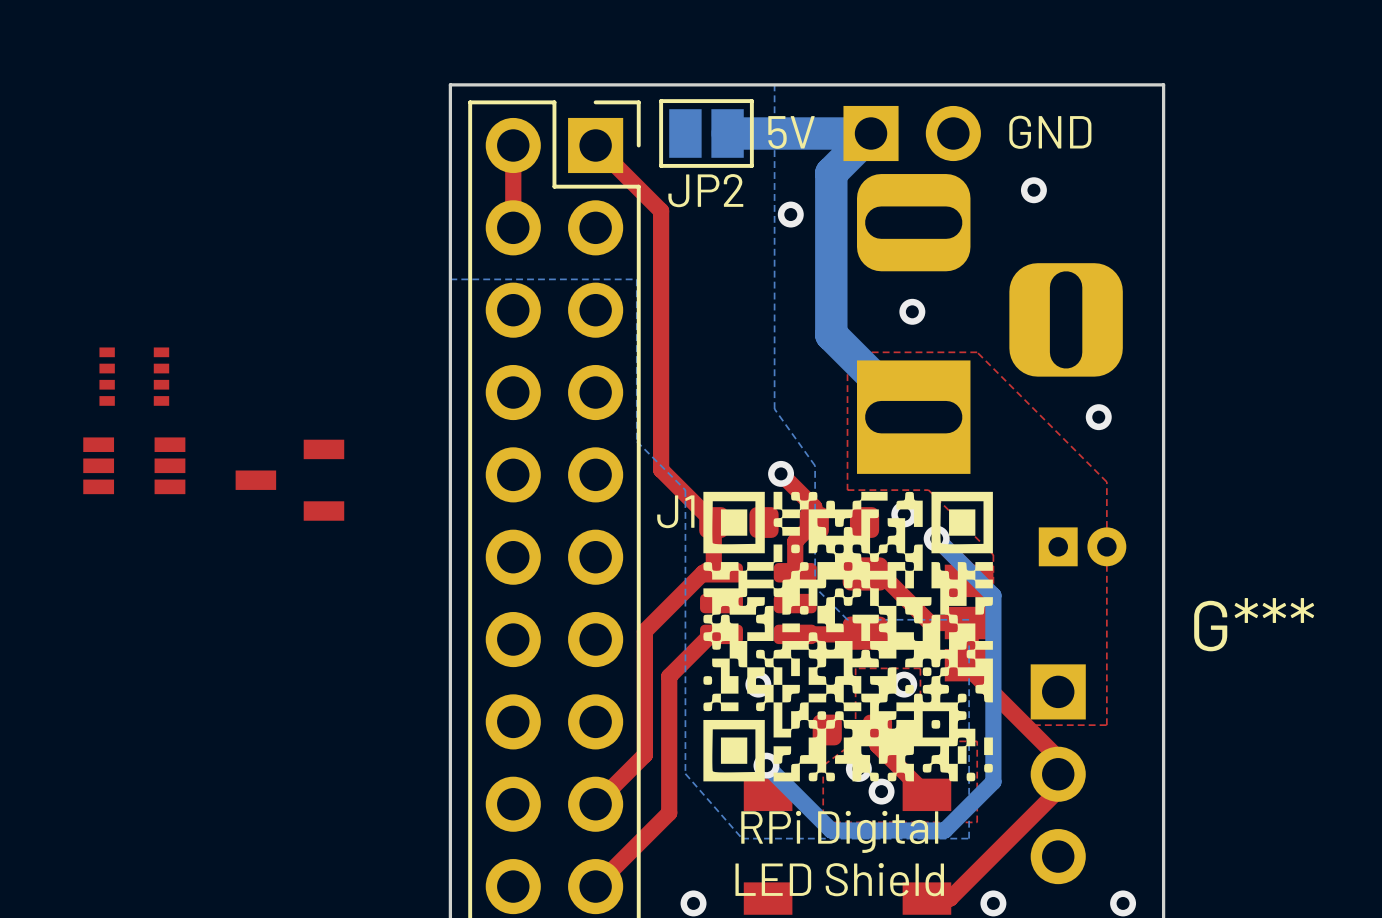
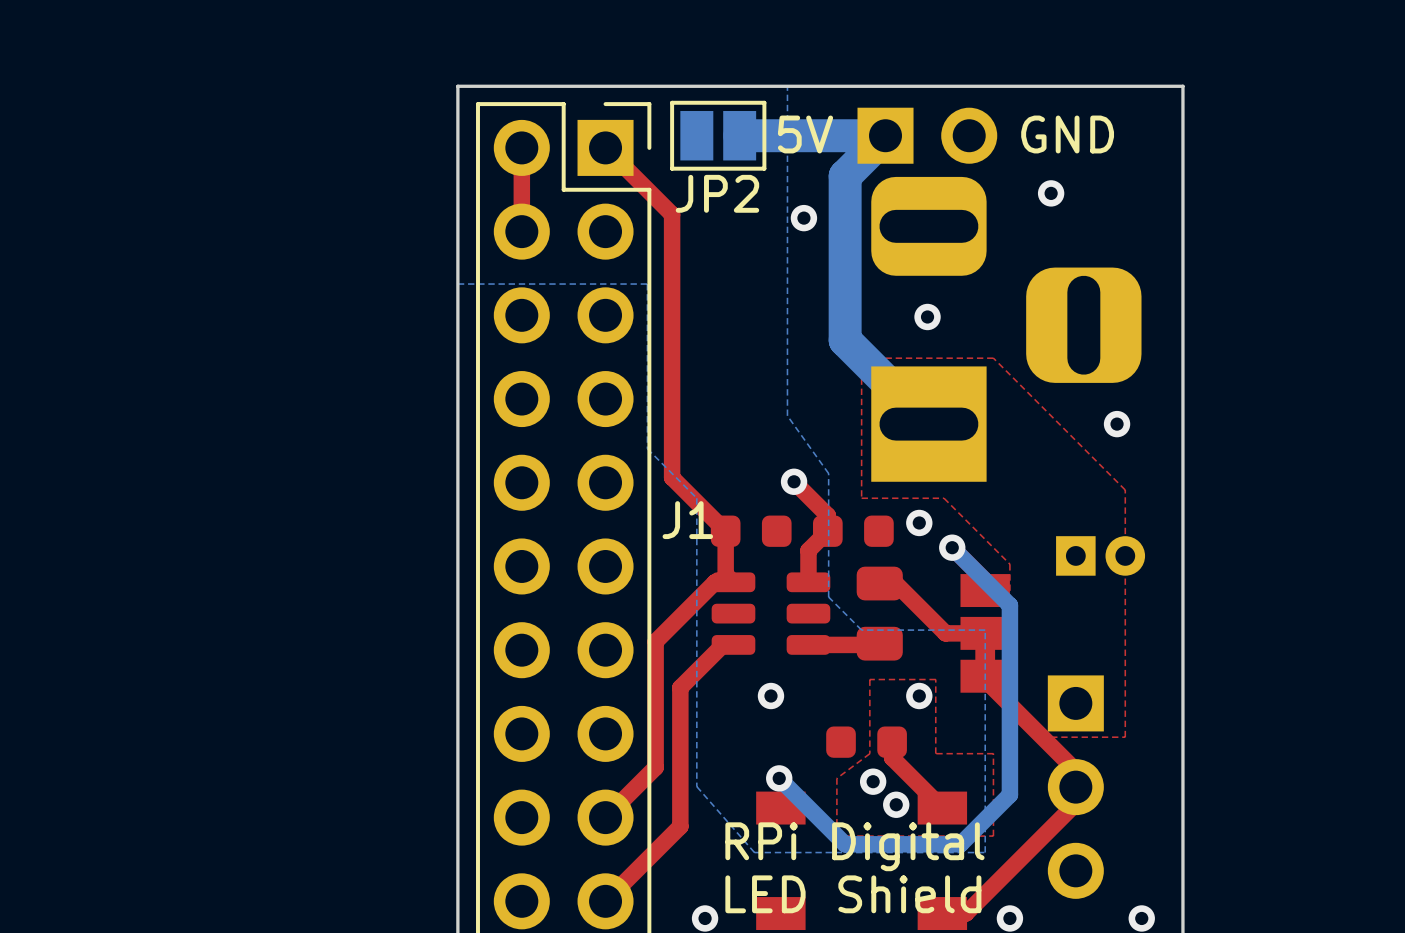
part: (134, 376) -> none
part: (134, 465) -> none
part: (289, 480) -> none
G***: (848, 636) -> none

